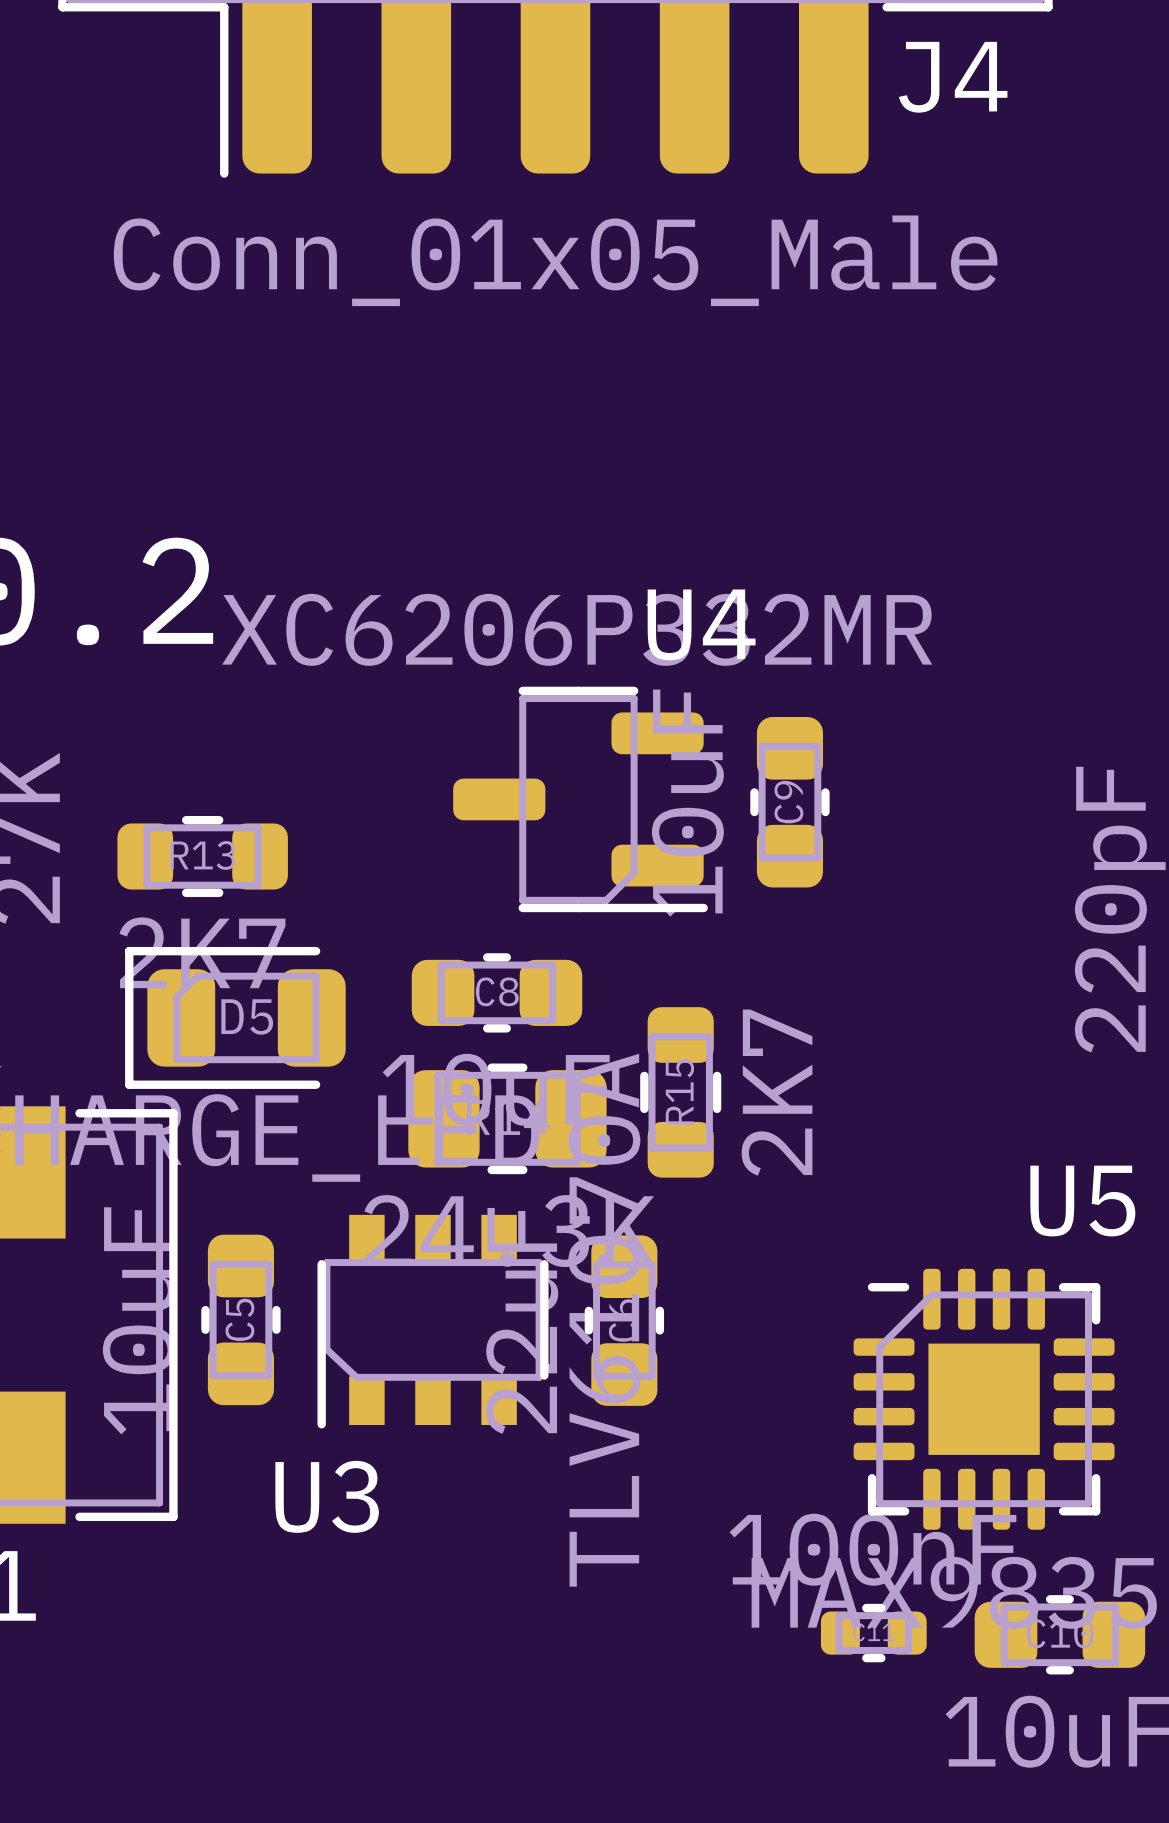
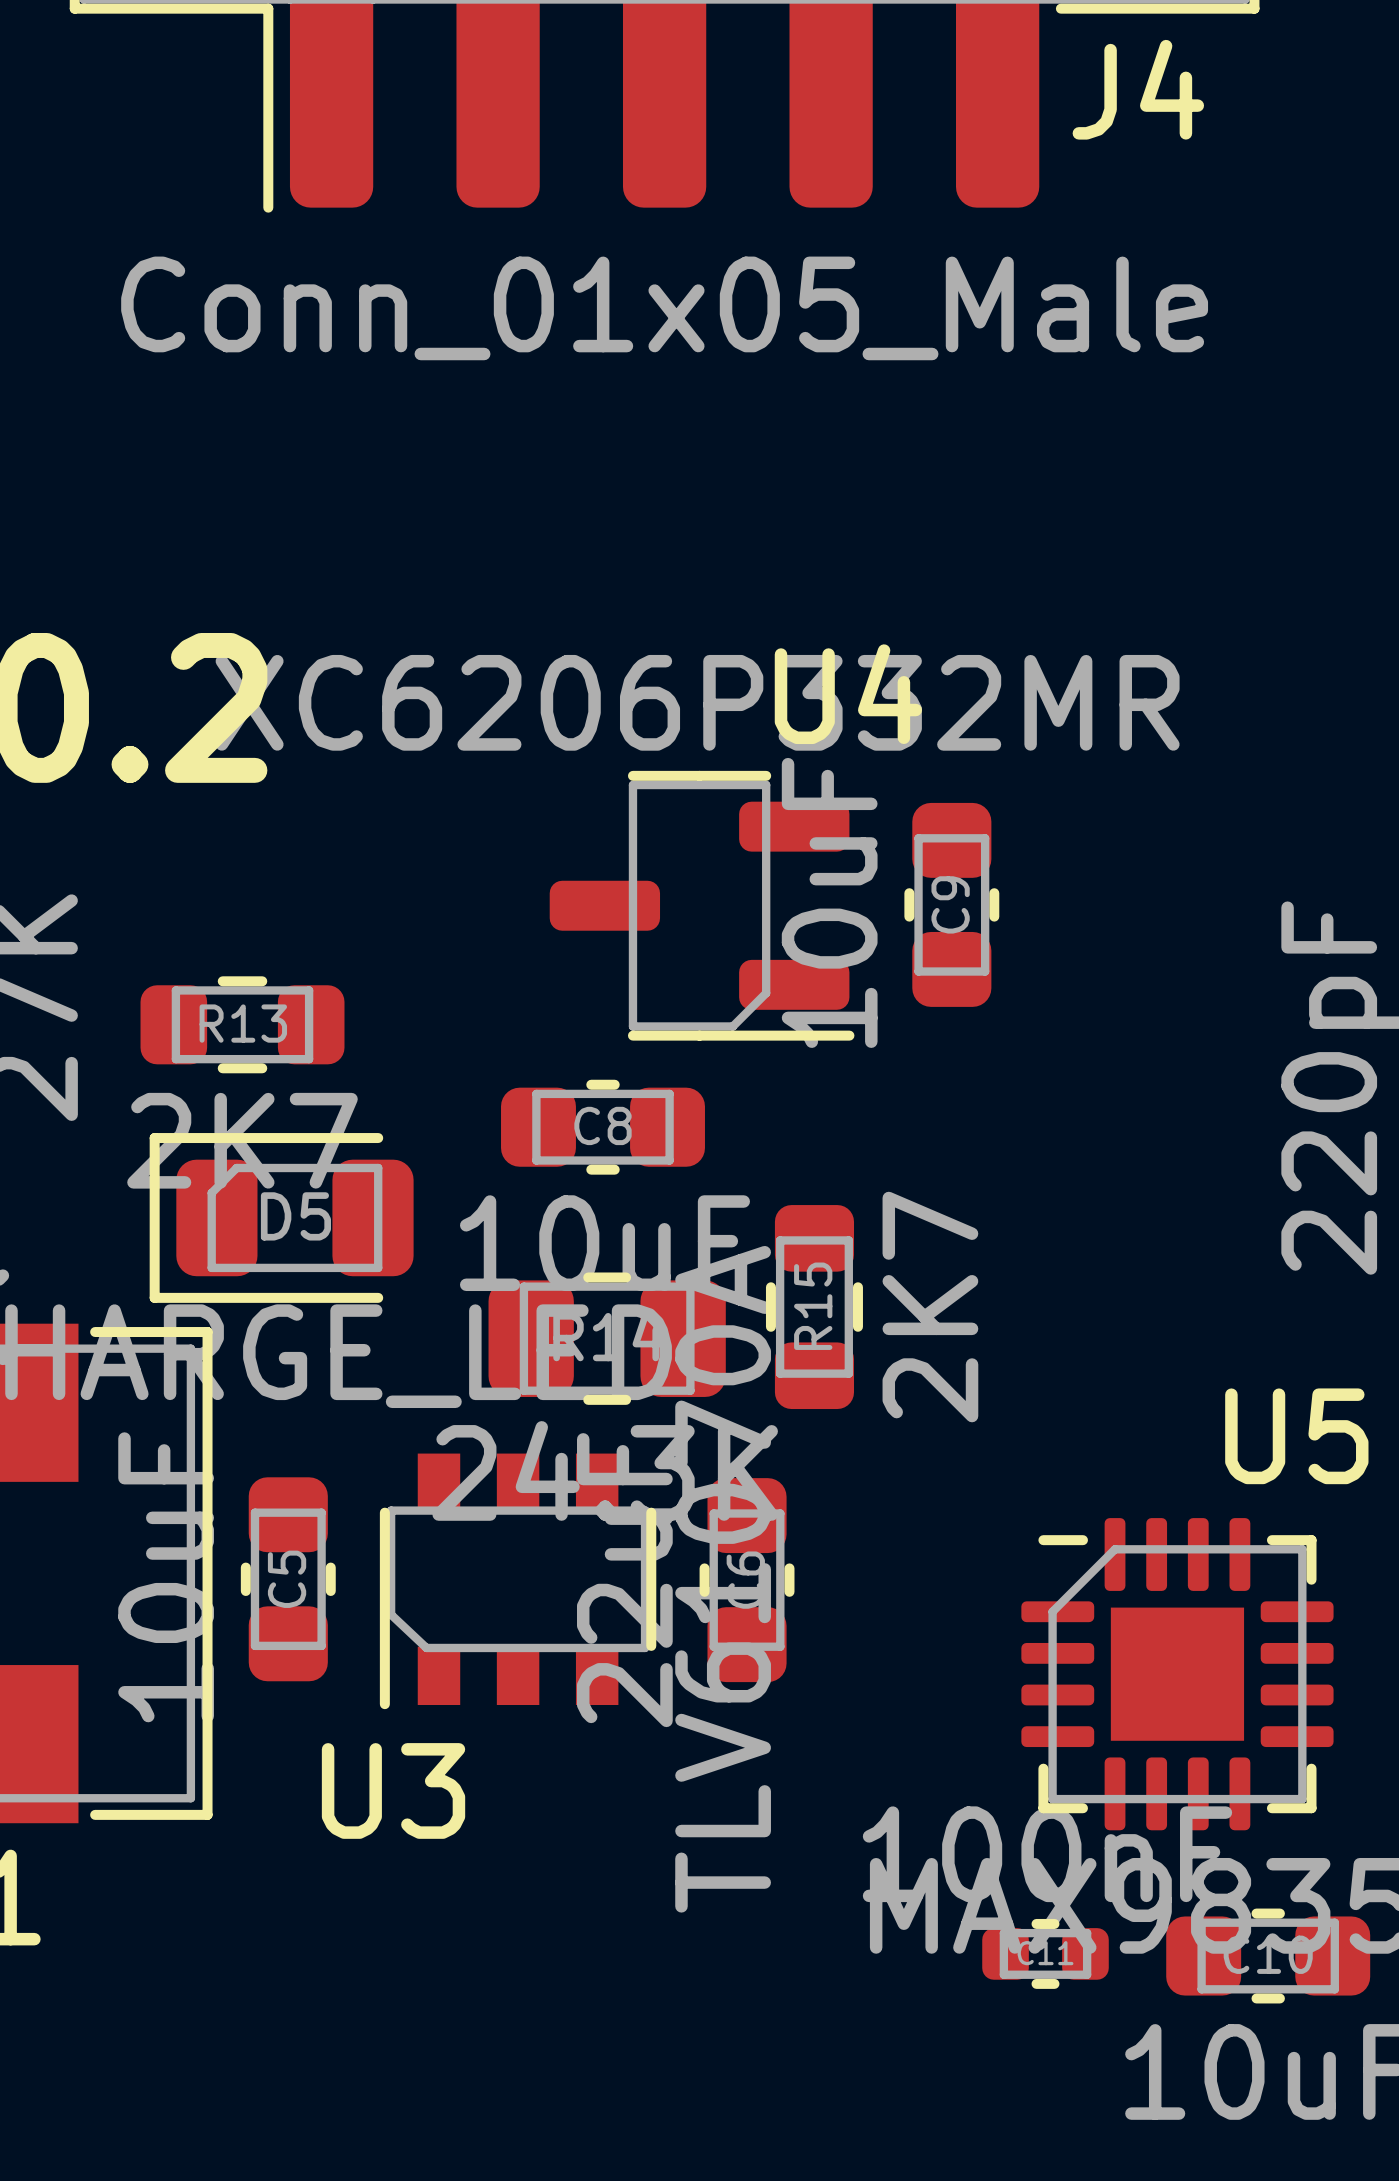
U4 position: (580, 799) -> (702, 905)
C9 position: (789, 802) -> (951, 904)
C8 position: (497, 992) -> (603, 1127)

